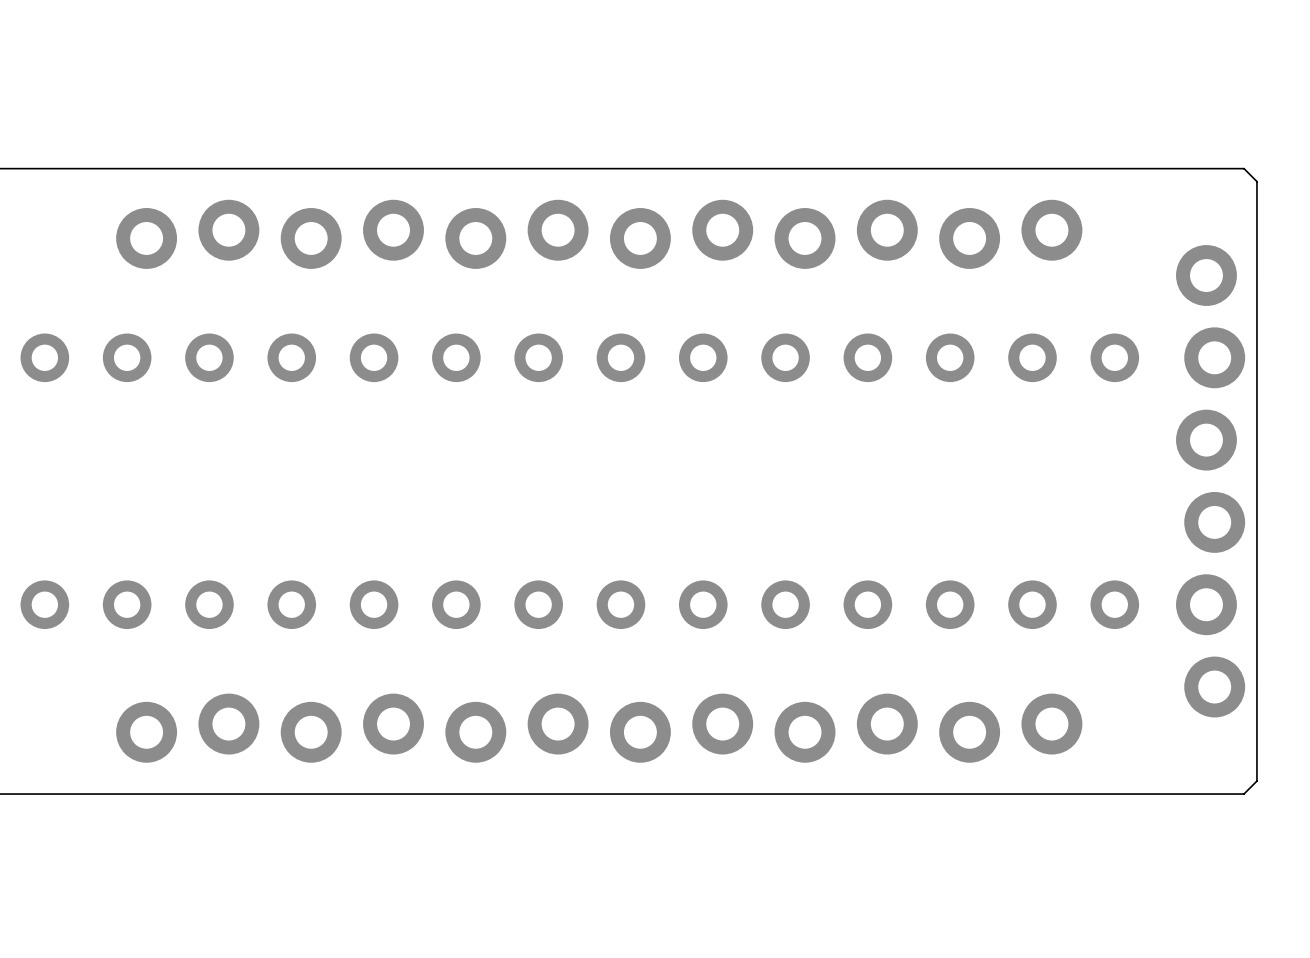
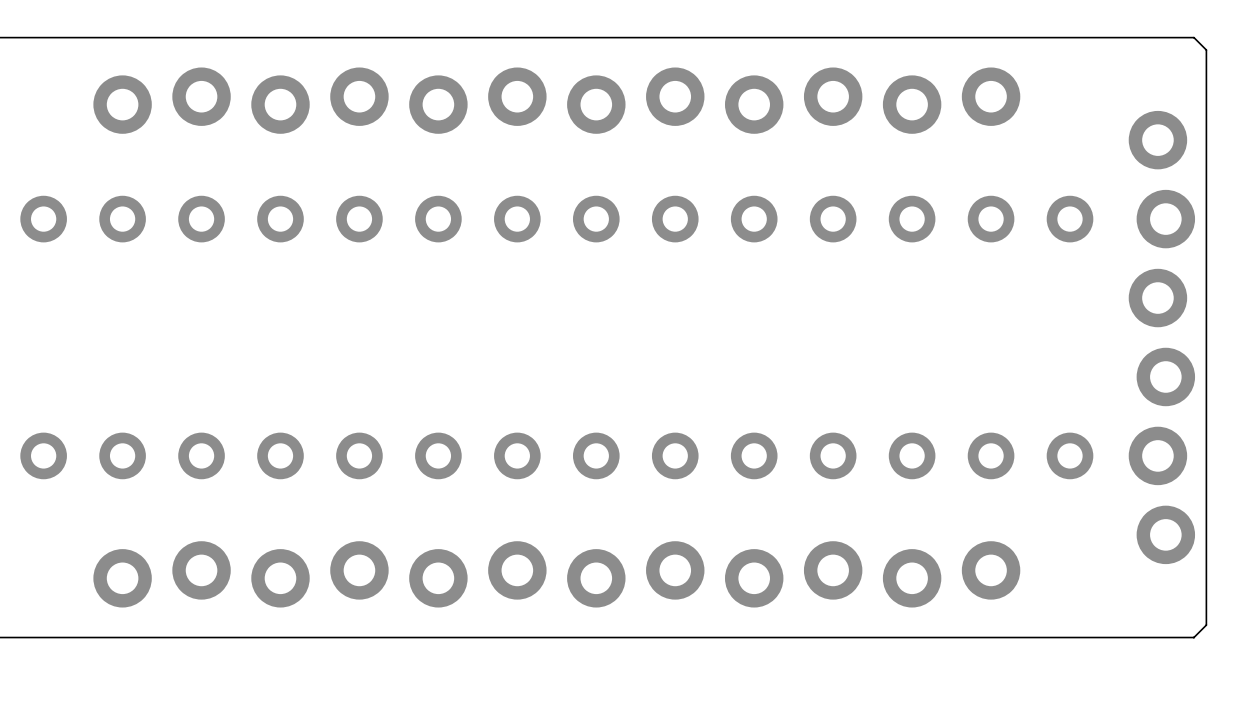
part position: (599, 234) -> (556, 100)
part position: (599, 728) -> (556, 574)

